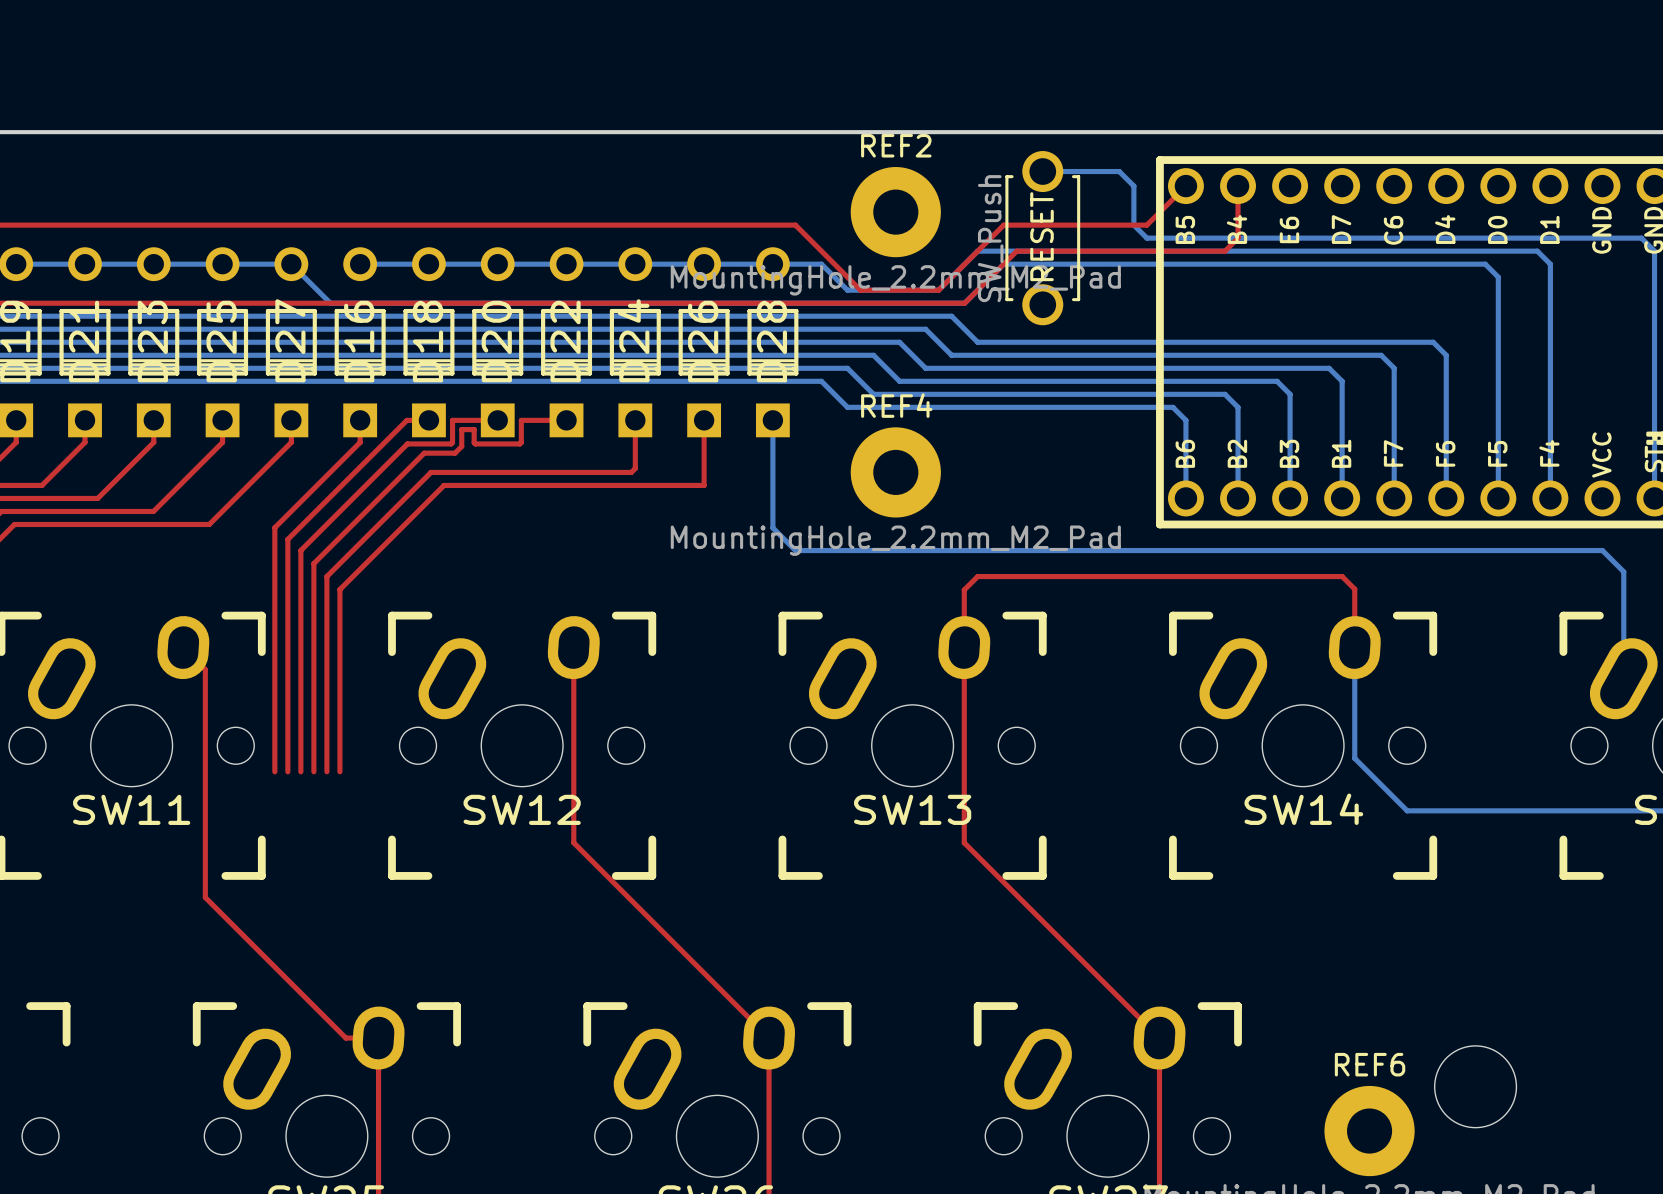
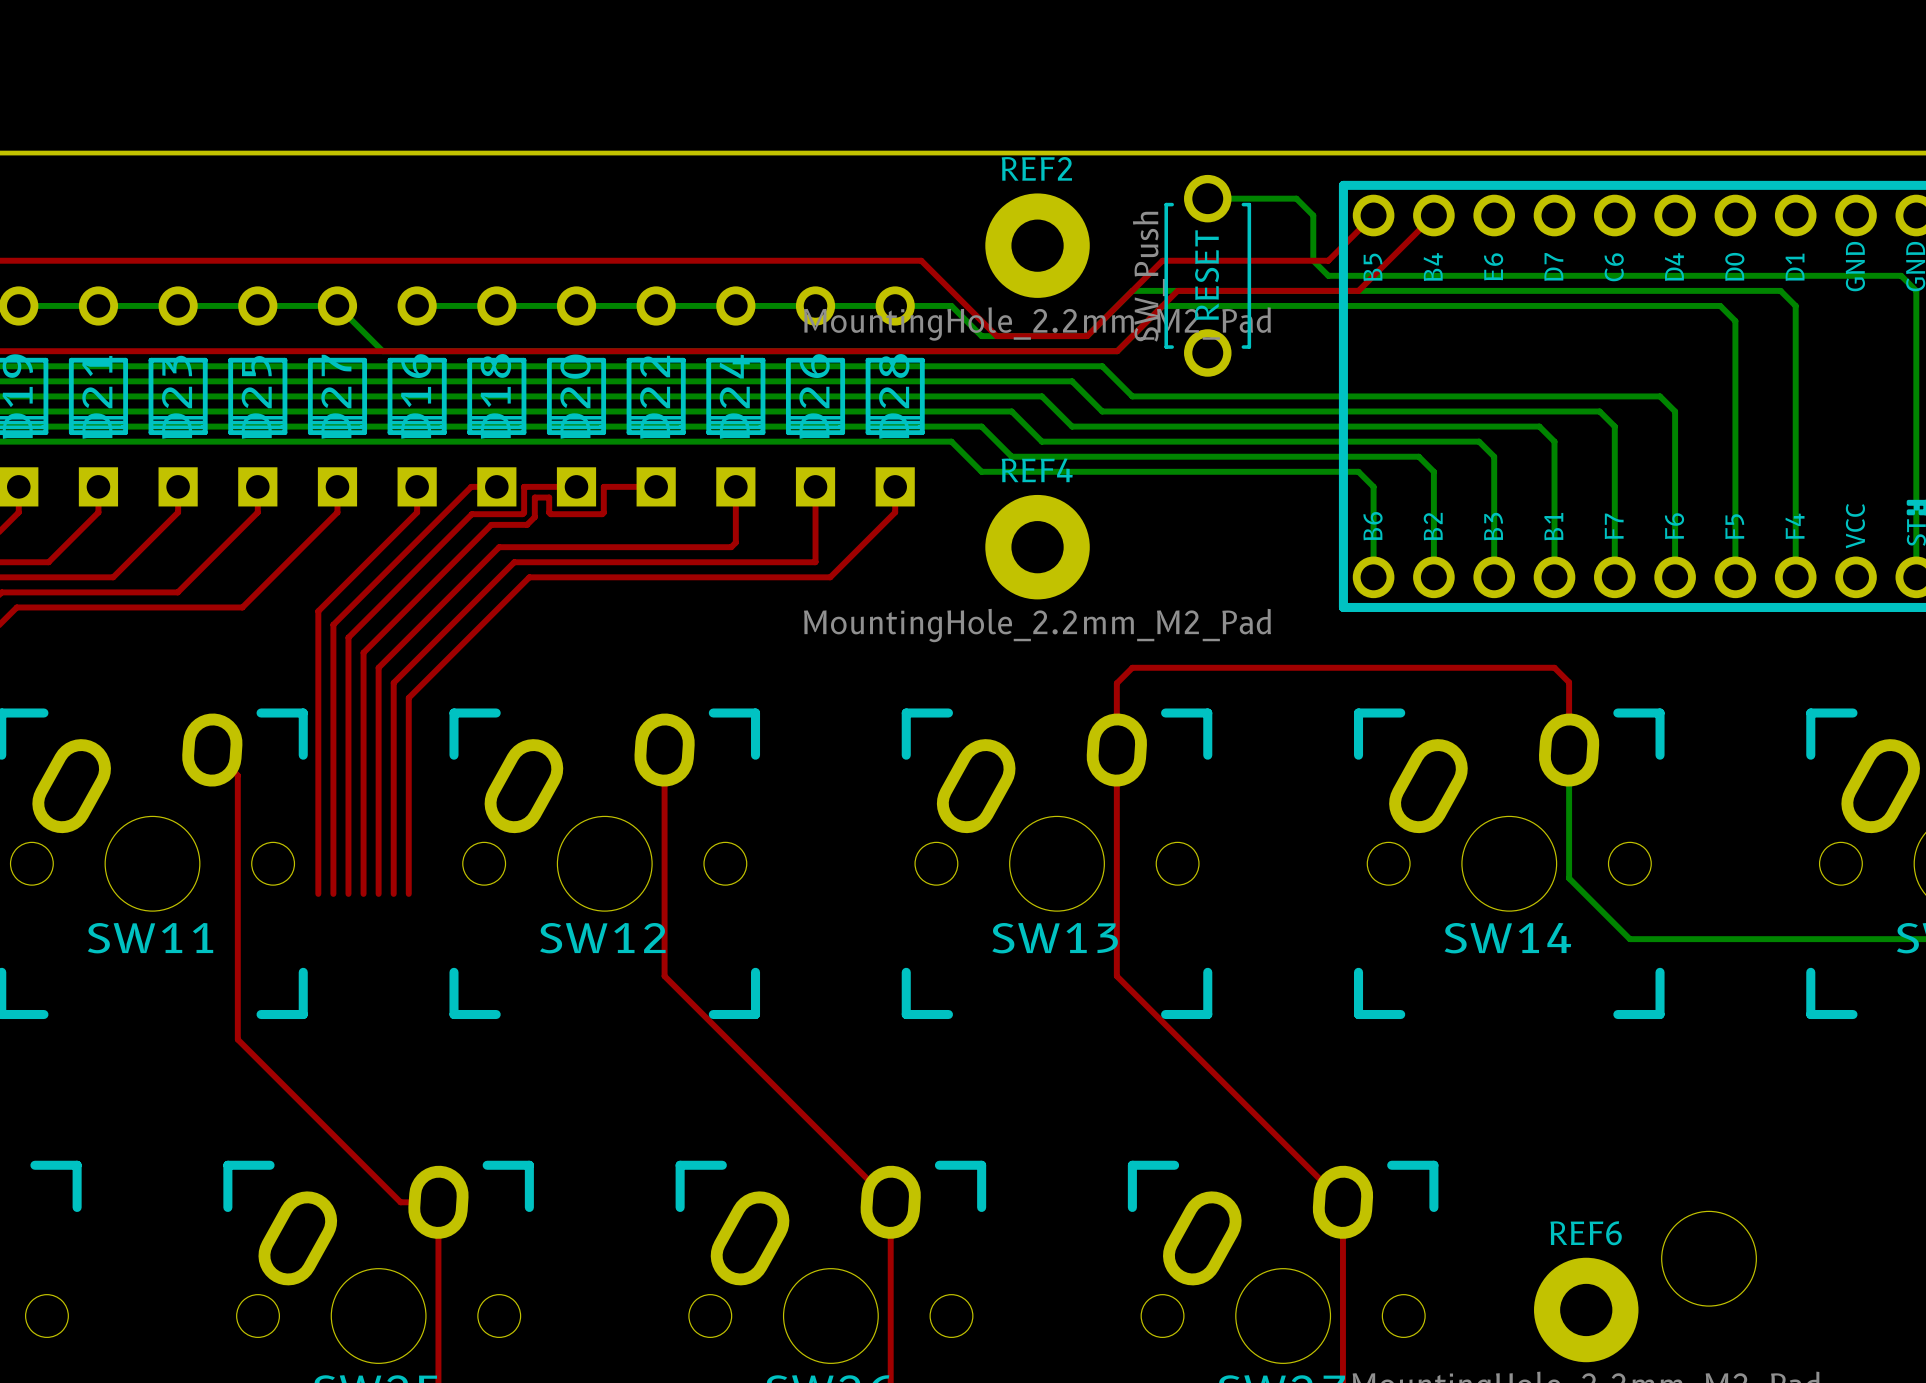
top track: (1238, 186) (1238, 238) (1225, 251) (1172, 251) -> (1433, 215) (1358, 290)
bottom track: (772, 420) (772, 527) (795, 550) (1602, 550) (1623, 571) (1623, 678) -> none
top track: none -> (895, 486) (895, 512) (830, 577) (529, 577) (408, 697) (408, 893)

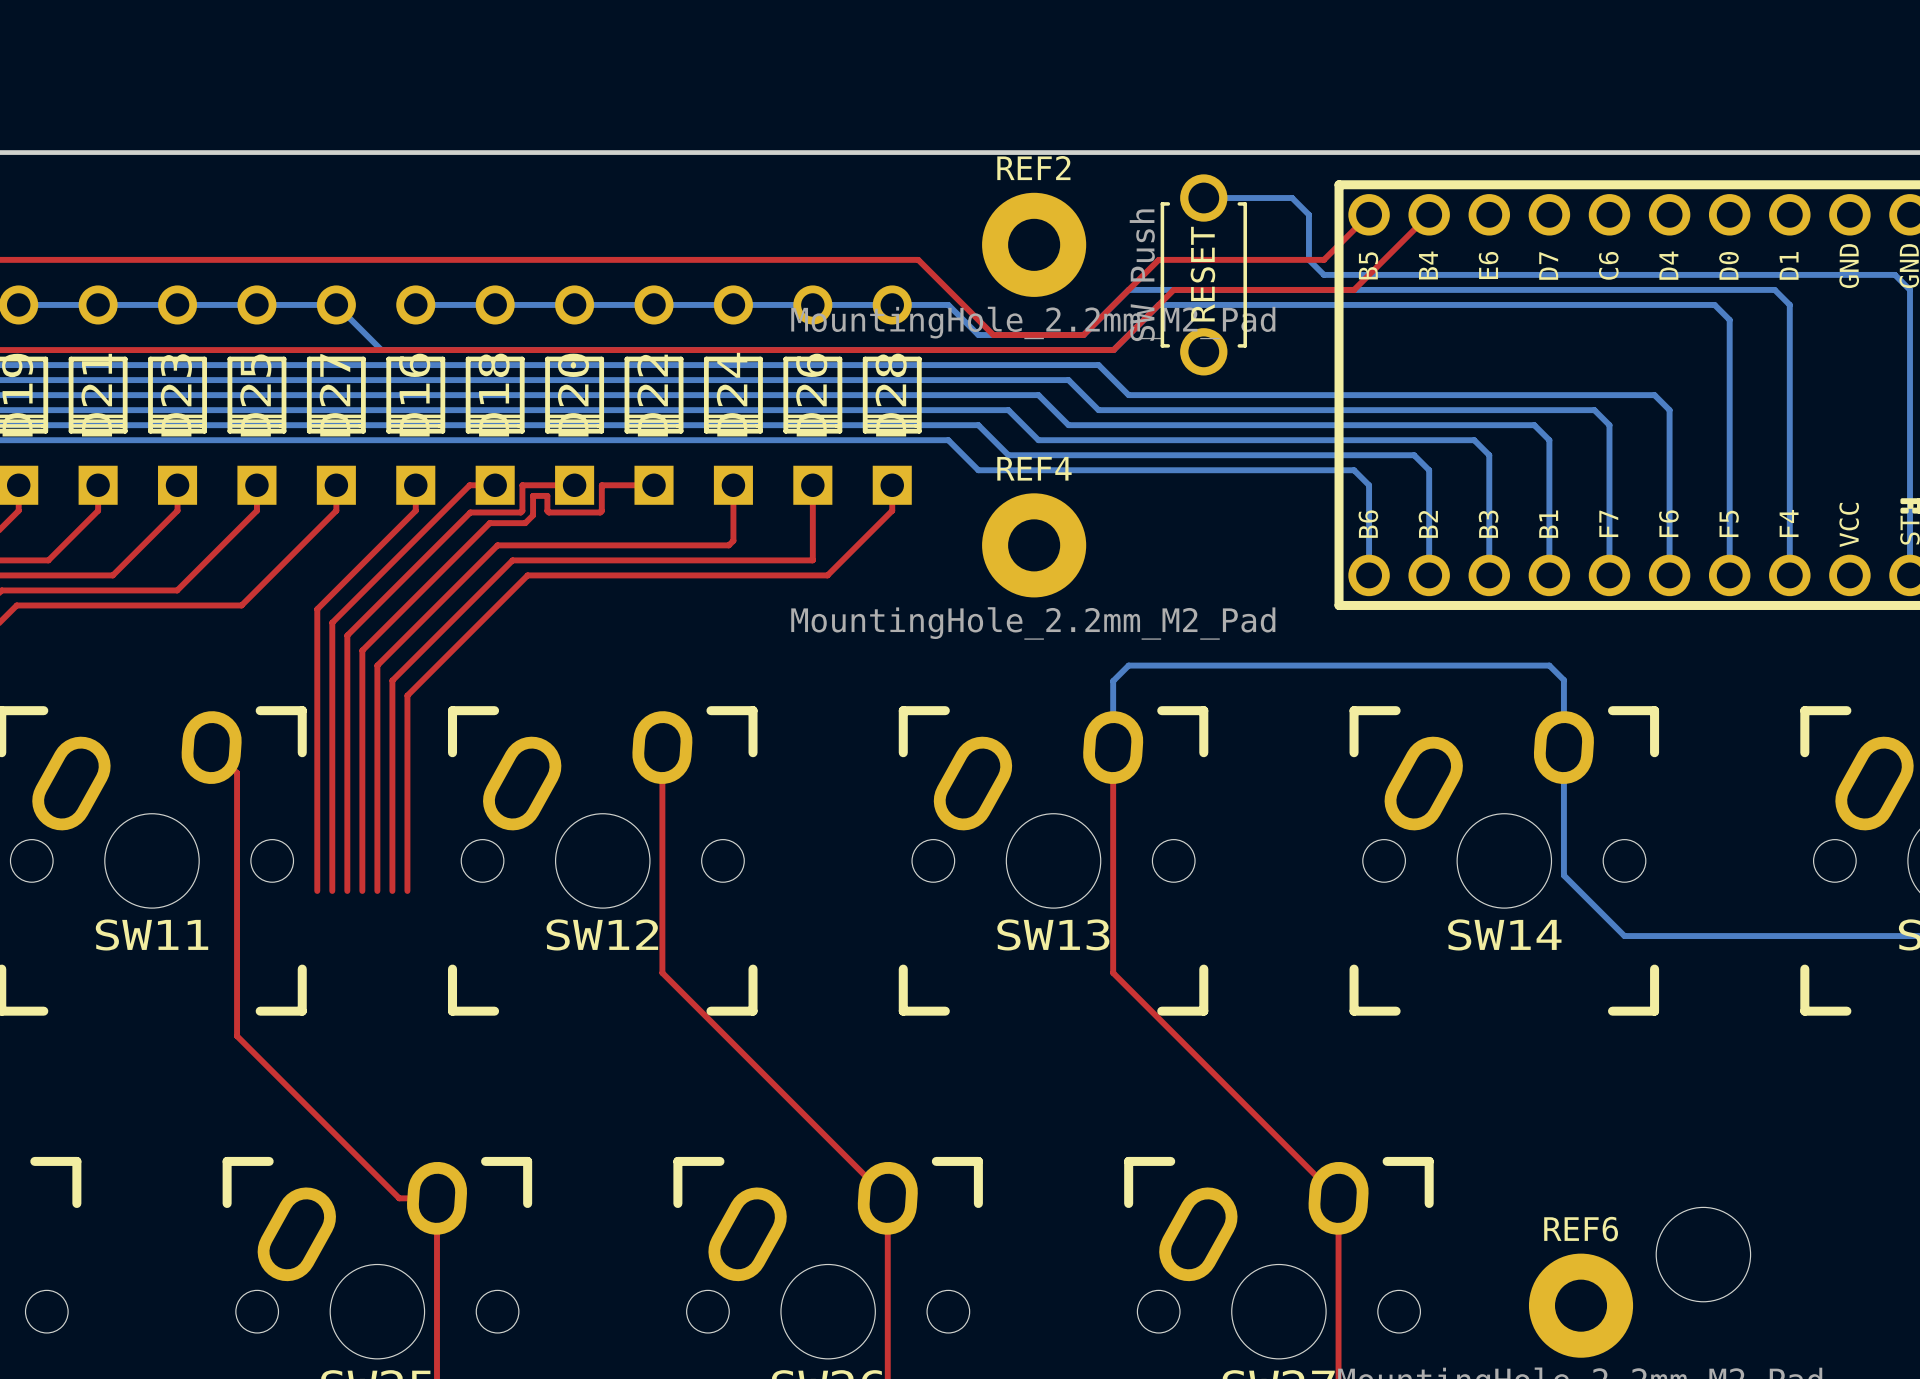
bottom track: none -> (1113, 747) (1113, 681) (1128, 665) (1549, 665) (1563, 680) (1563, 747)
top track: (1116, 750) (1116, 683) (1132, 667) (1554, 667) (1569, 682) (1569, 750) -> none

